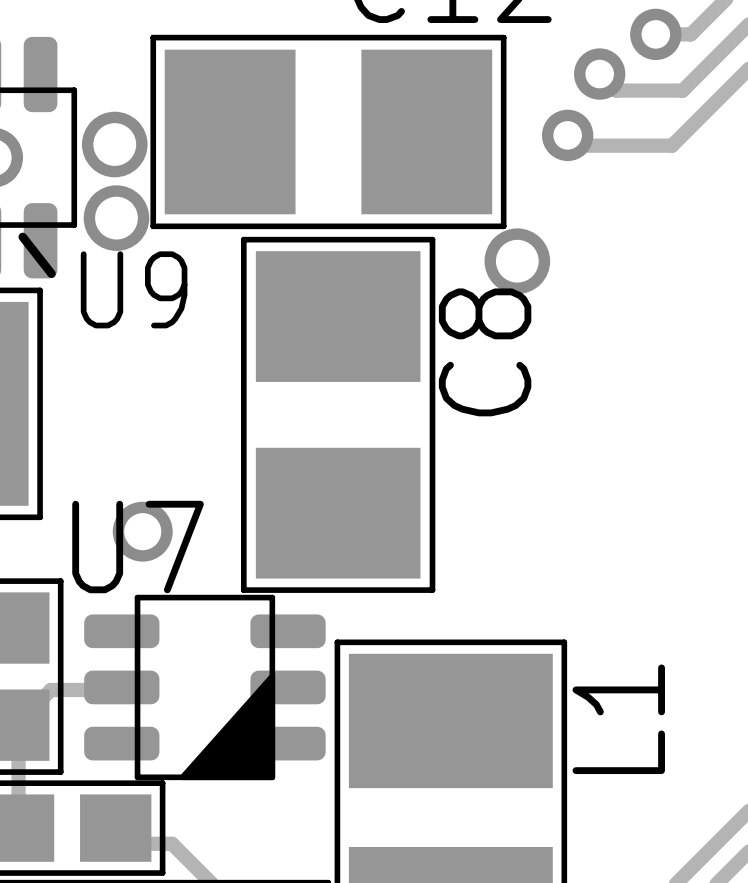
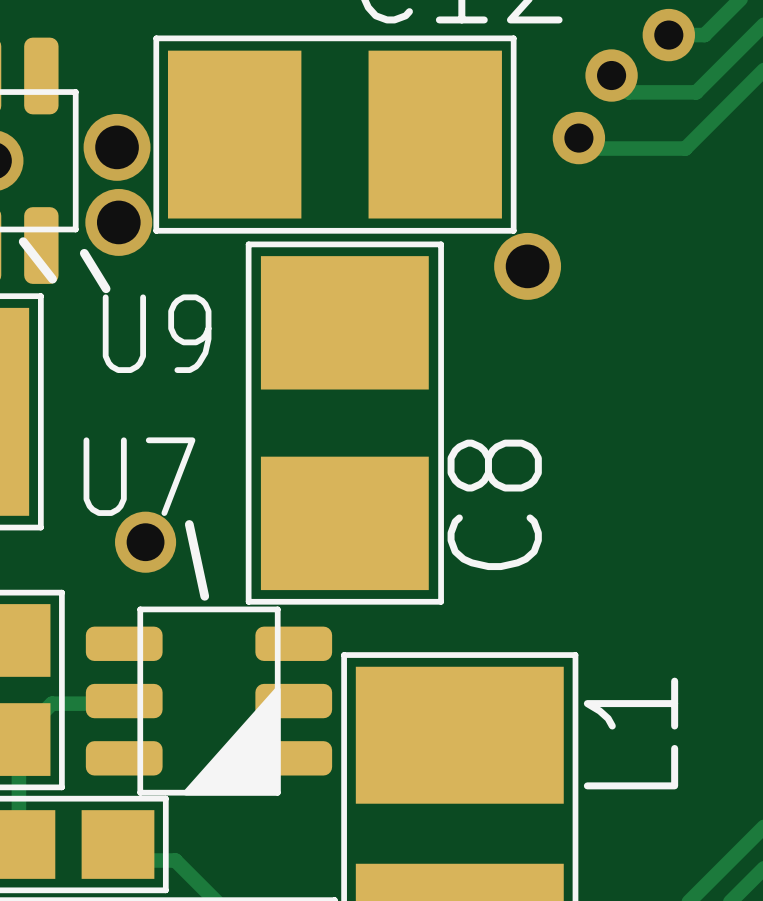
line: none -> (84, 253) (106, 288)
U9 name position: U9 (134, 289) -> U9 (157, 333)
C8 name position: C8 (485, 352) -> C8 (494, 504)
line: none -> (189, 524) (204, 596)
U7 name position: U7 (138, 547) -> U7 (139, 476)

